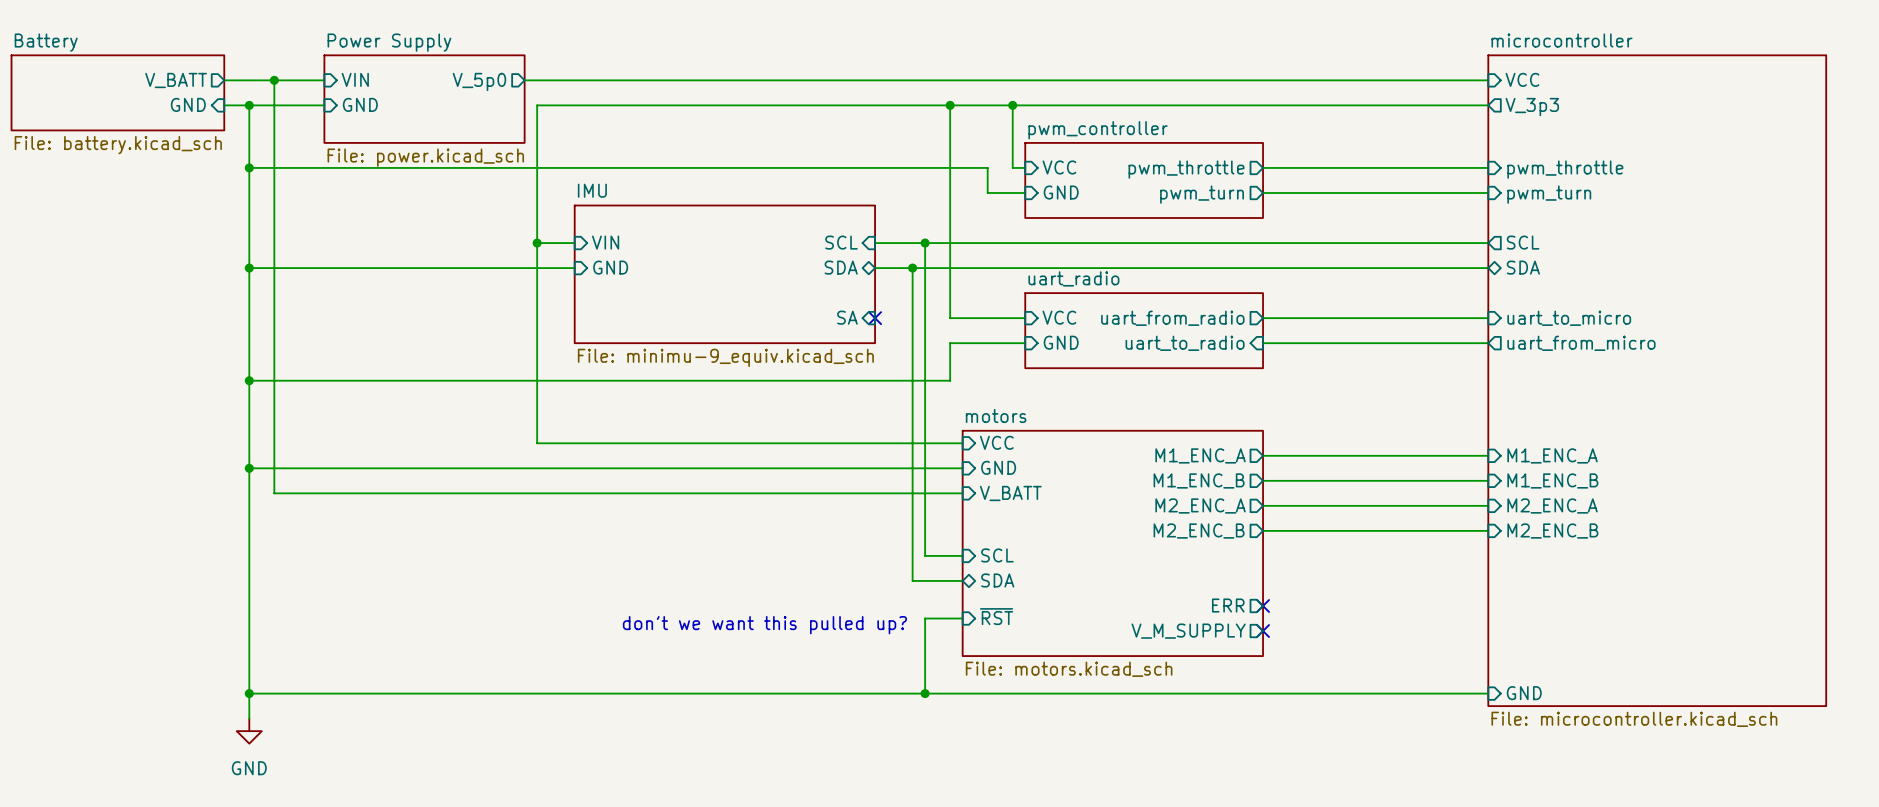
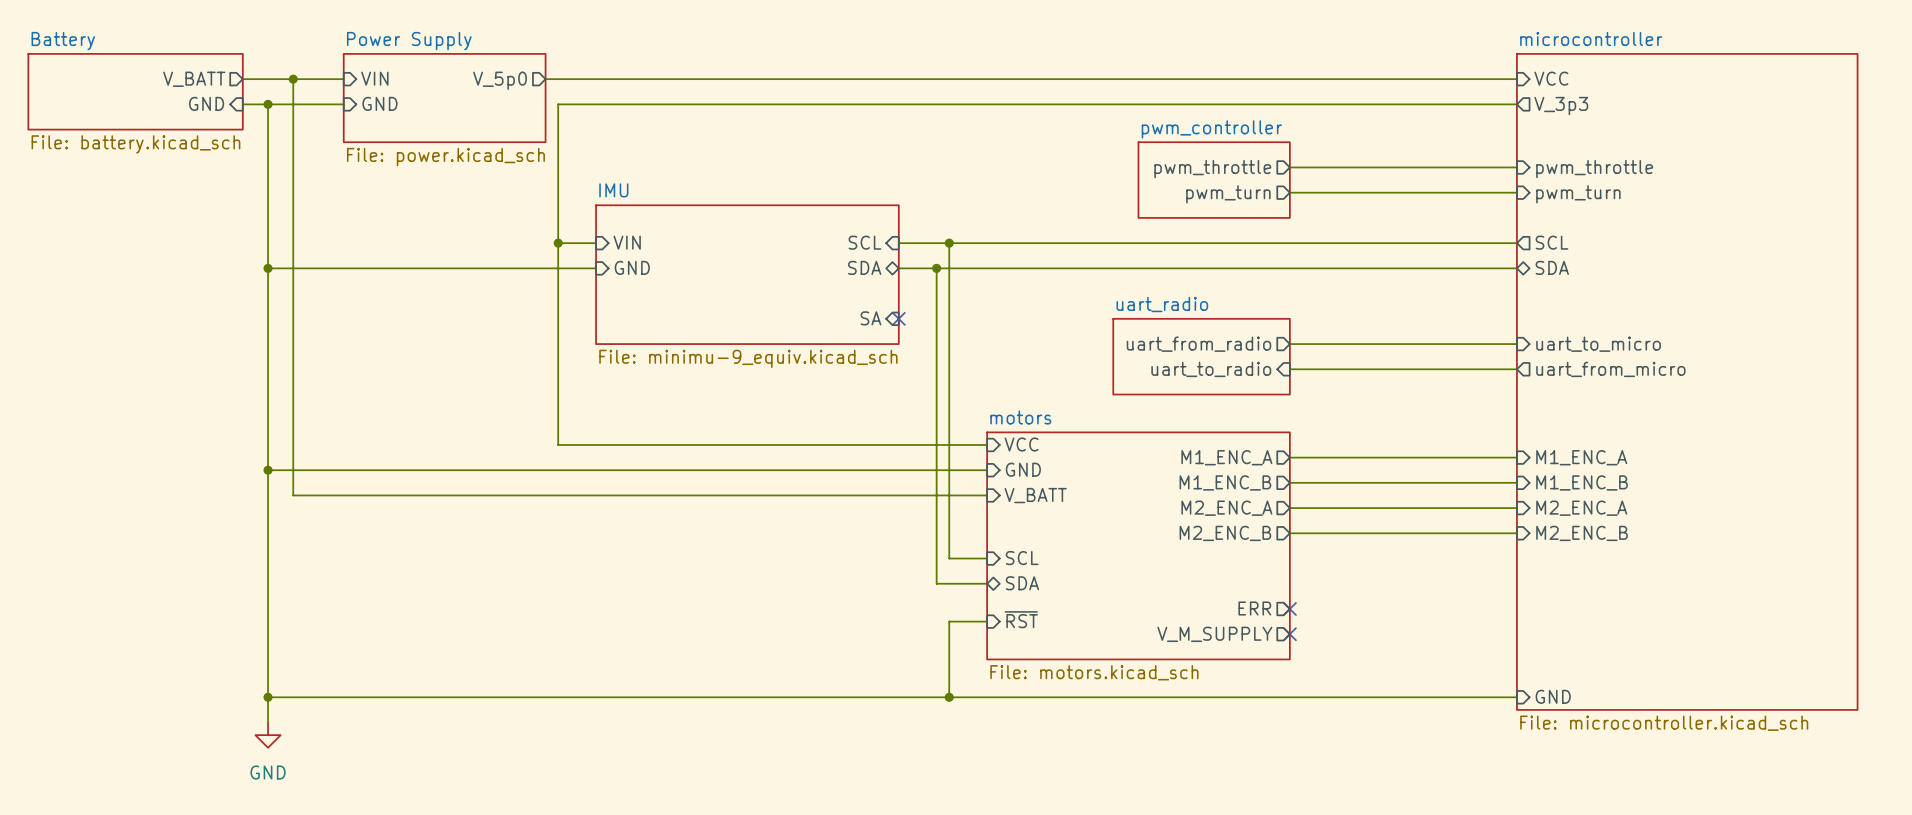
wire: (950, 105) (950, 318) (1025, 318) -> none
junction: (950, 105) -> none
wire: (1012, 105) (1012, 167) (1025, 167) -> none
junction: (1012, 105) -> none
wire: (249, 167) (987, 167) (987, 192) (1025, 192) -> none
junction: (249, 167) -> none
sheet pin: VCC (1059, 167) -> none
sheet pwm_controller: (1144, 180) -> none
sheet pwm_controller: none -> (1214, 180)
sheet pin: GND (1061, 192) -> none
sheet pin: VCC (1059, 317) -> none
sheet pin: uart_from_radio (1172, 318) -> none
wire: (1263, 318) (1488, 318) -> (1289, 369) (1516, 369)
sheet pin: uart_to_micro (1569, 318) -> none
sheet uart_radio: (1144, 330) -> none
sheet pin: GND (1061, 342) -> none
wire: (1025, 343) (950, 343) (950, 380) (249, 380) -> none
sheet pin shape: input (1185, 343) -> output (1198, 344)
sheet pin: uart_to_radio (1185, 343) -> uart_from_radio (1198, 344)
sheet pin shape: output (1581, 343) -> input (1598, 344)
sheet pin: uart_from_micro (1581, 343) -> uart_to_micro (1598, 344)
sheet uart_radio: none -> (1201, 356)
sheet pin: none -> uart_to_radio (1211, 369)
sheet pin: none -> uart_from_micro (1610, 369)
junction: (249, 380) -> none
text: don't we want this pulled up? (764, 625) -> none

